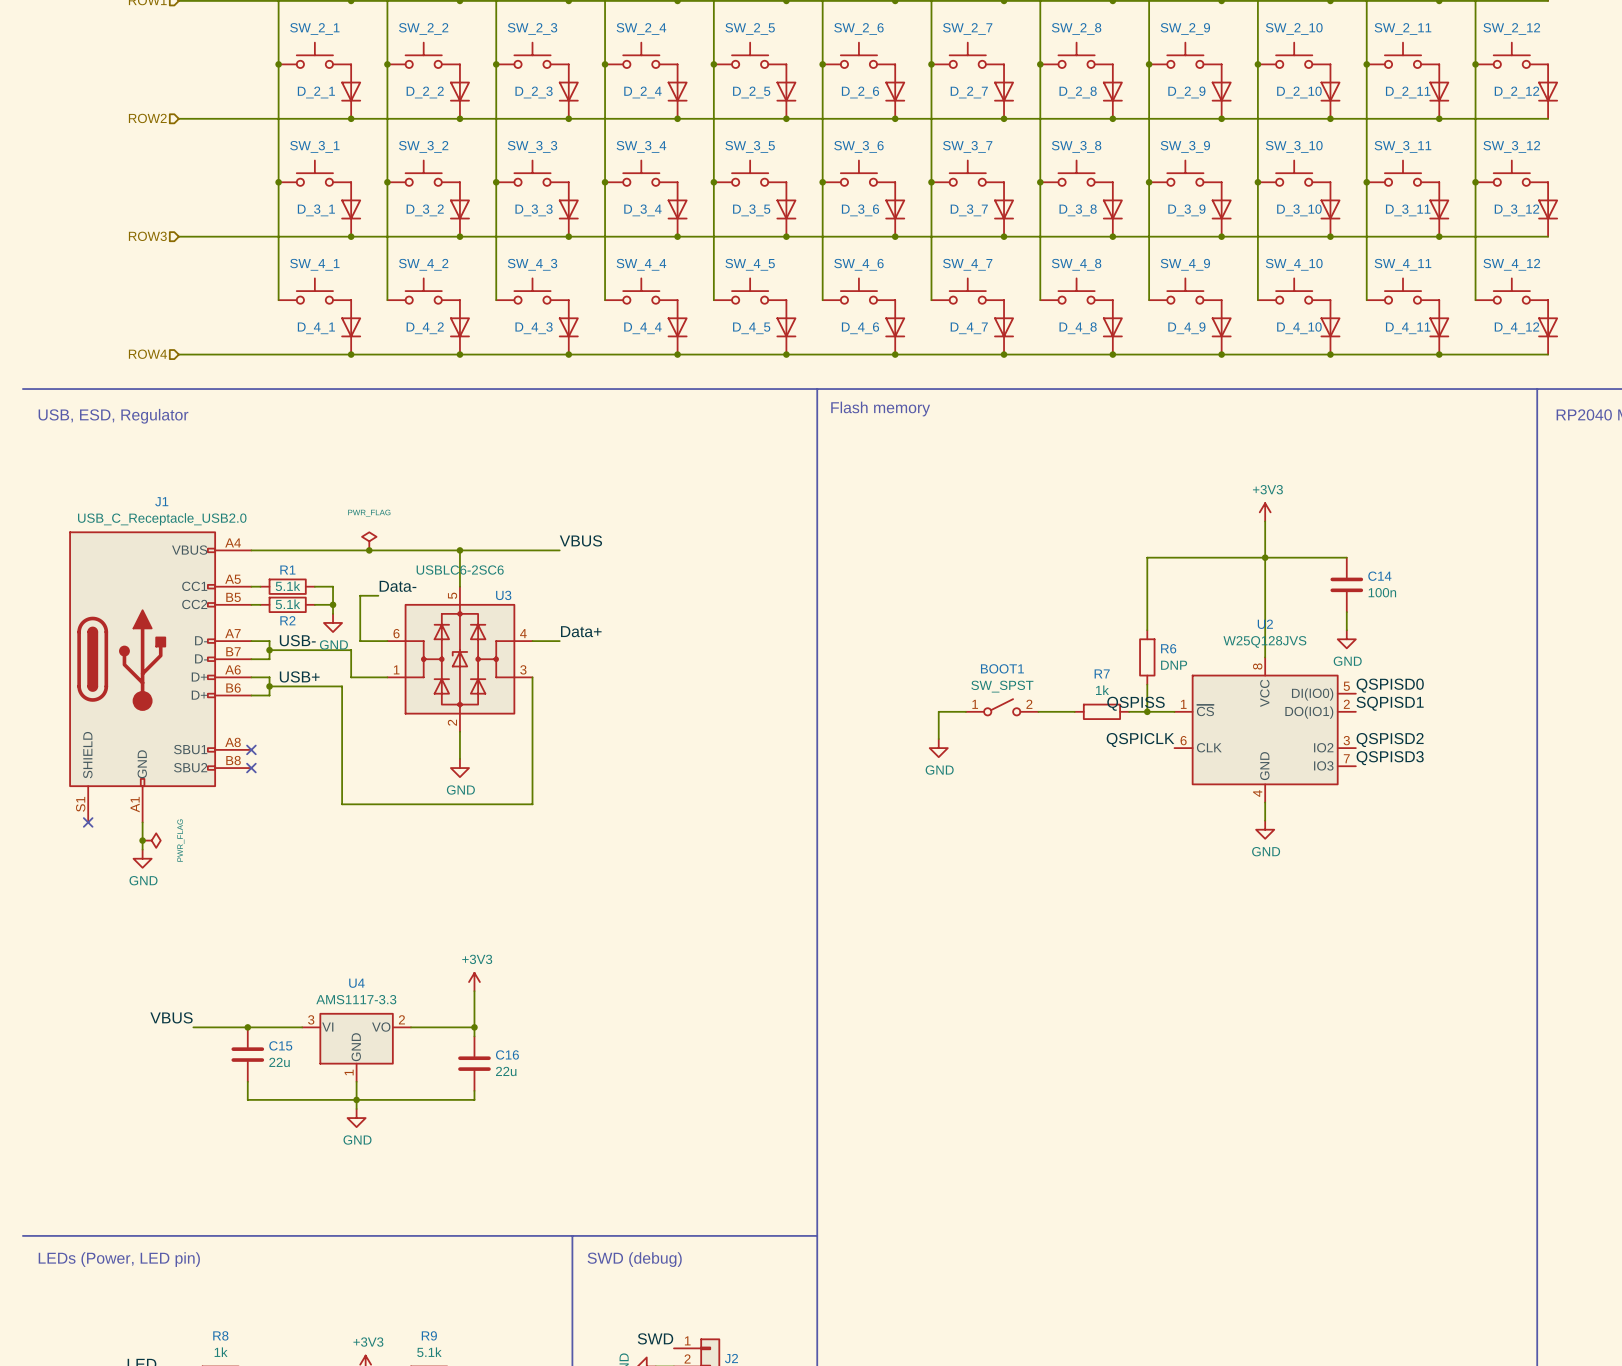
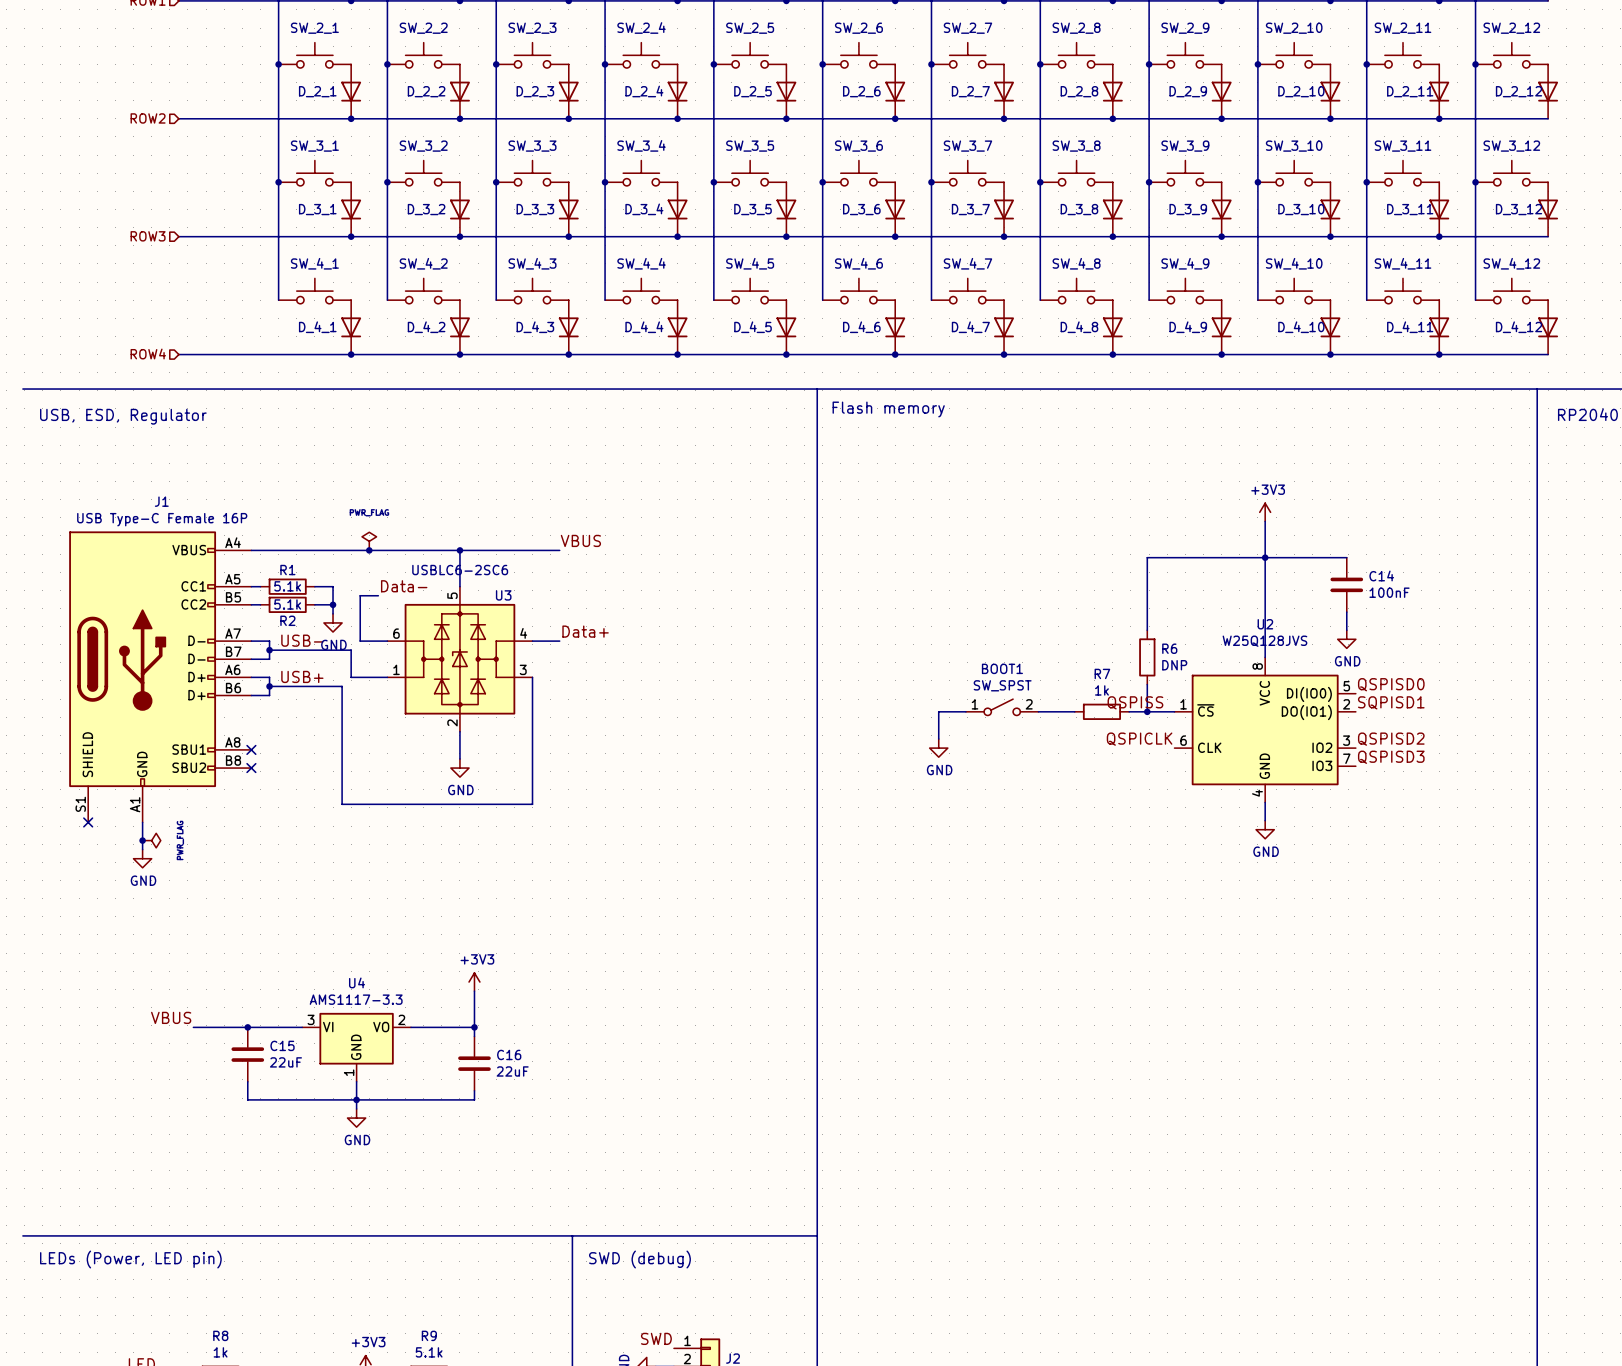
J1 value: USB_C_Receptacle_USB2.0 (162, 519) -> USB Type-C Female 16P (162, 519)
C14 value: 100n (1382, 592) -> 100nF (1389, 592)
C15 value: 22u (279, 1062) -> 22uF (285, 1062)
C16 value: 22u (506, 1071) -> 22uF (512, 1071)

